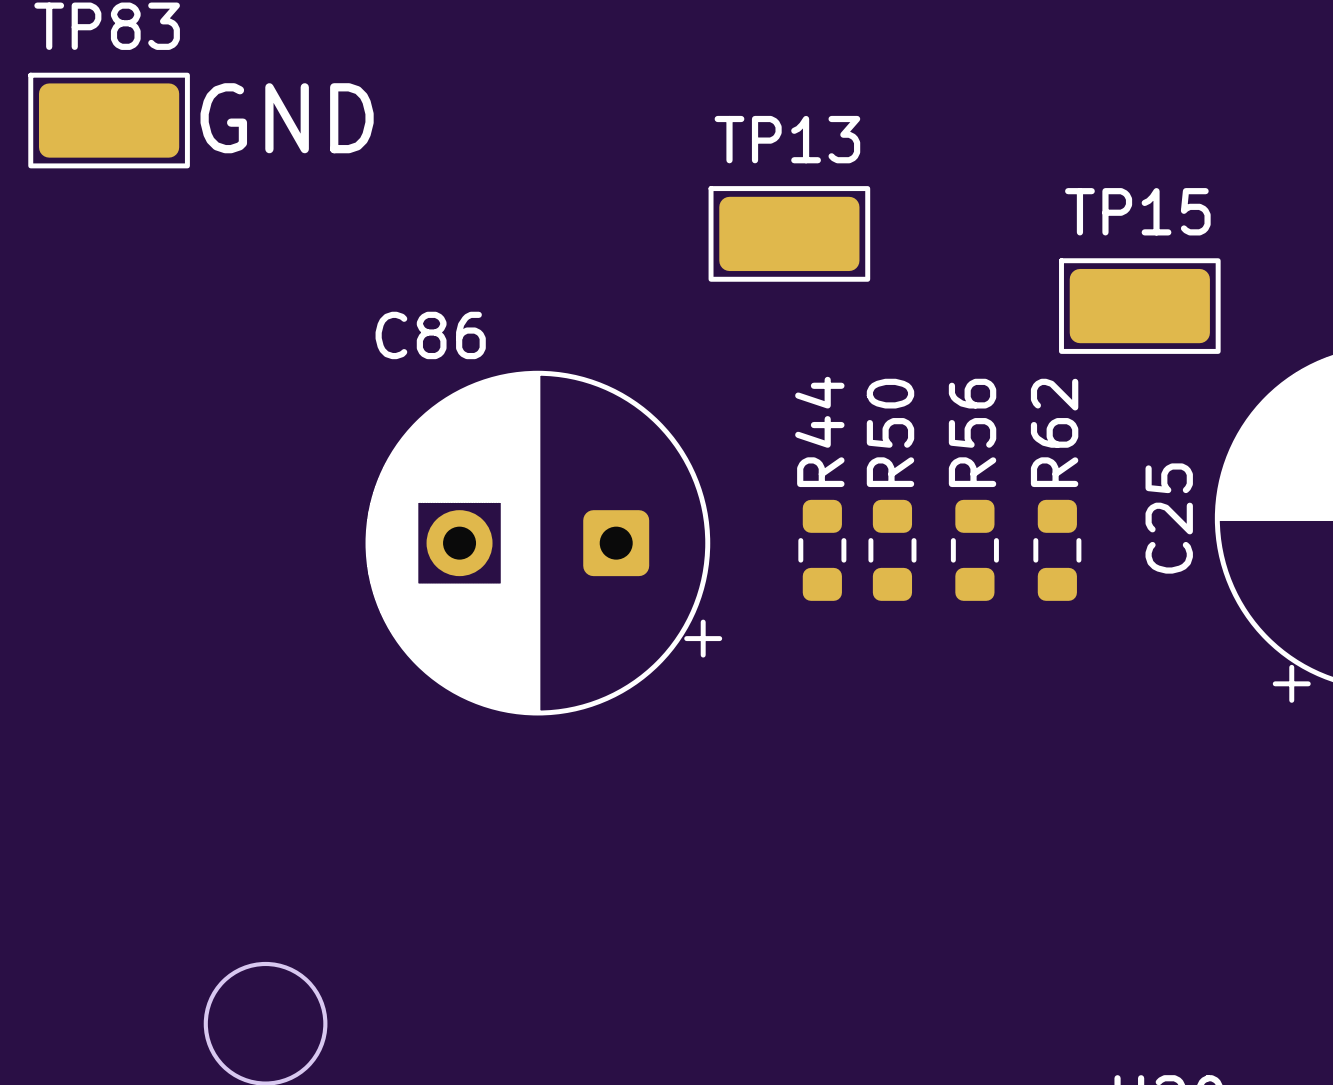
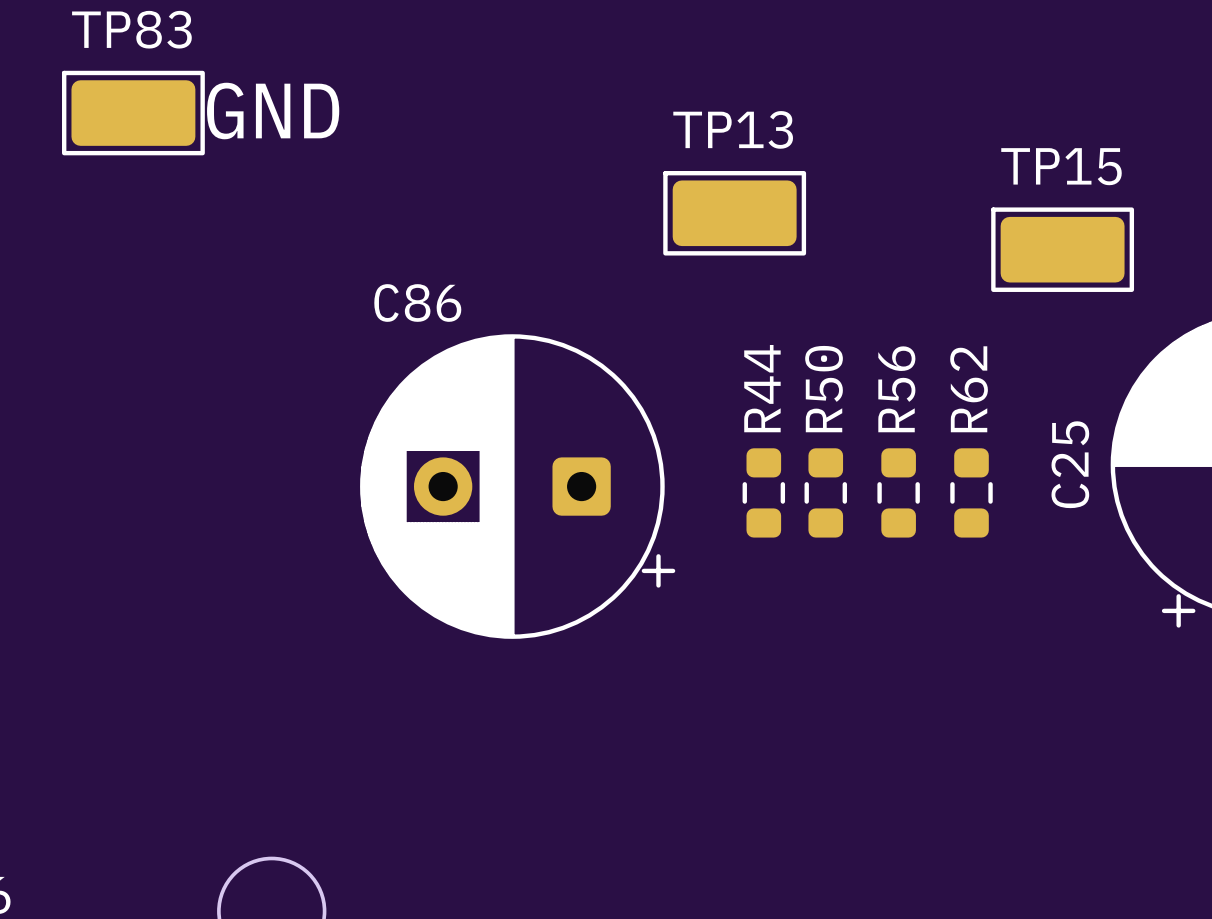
TP15 position: (1139, 306) -> (1062, 249)

